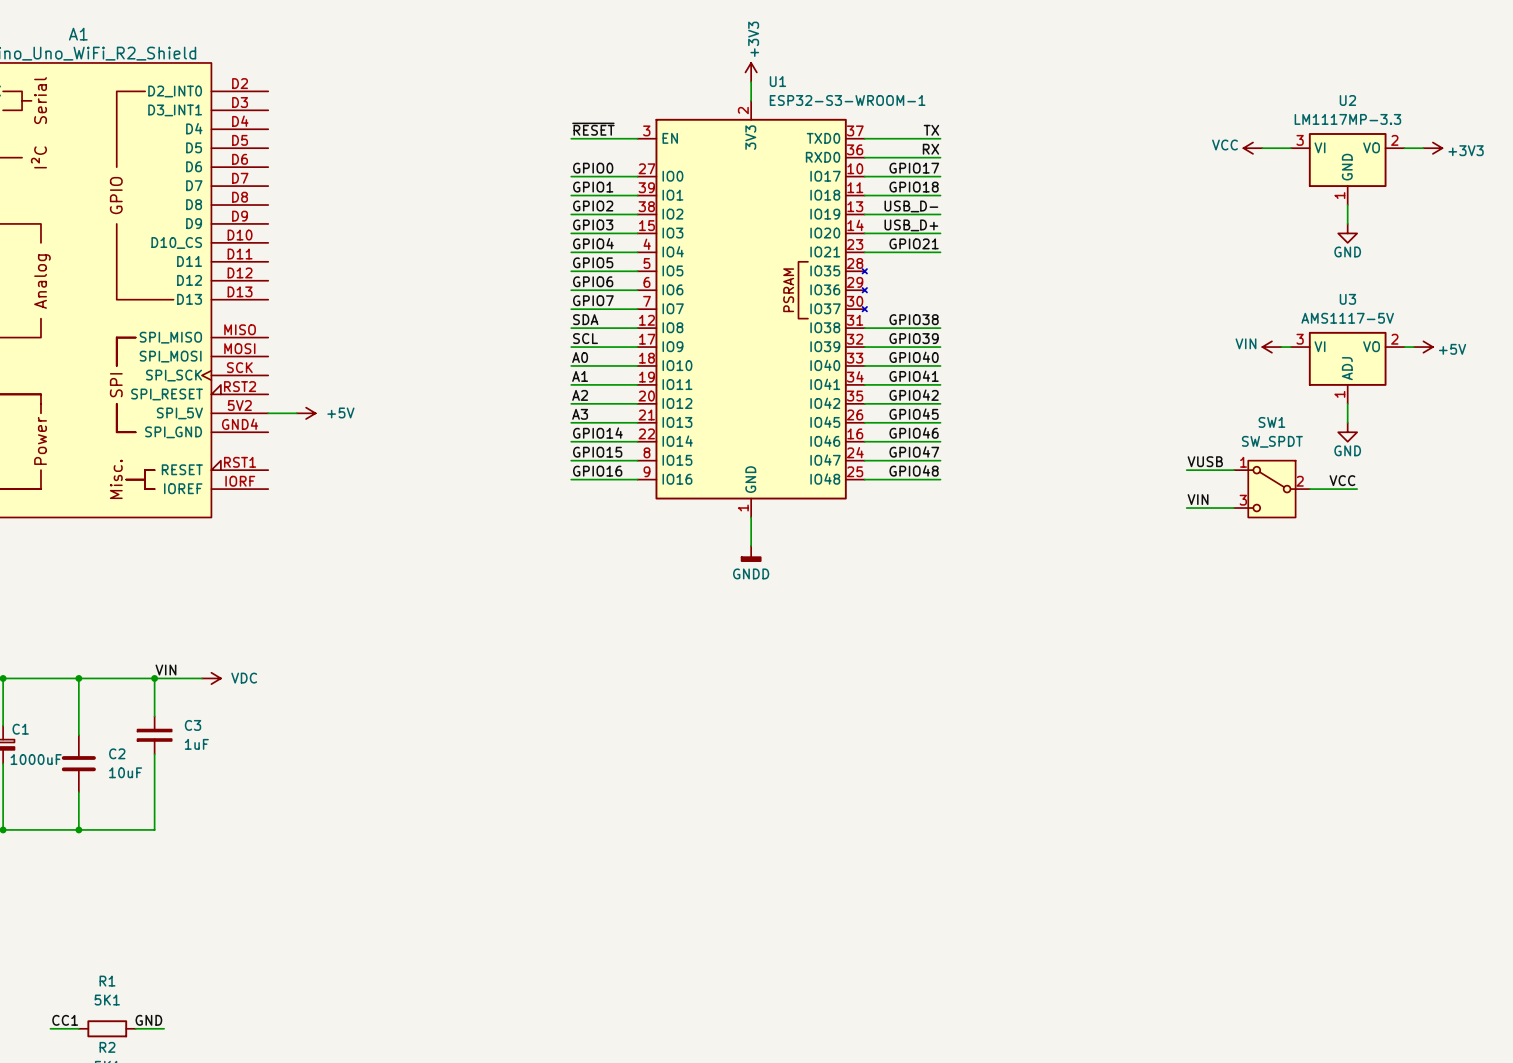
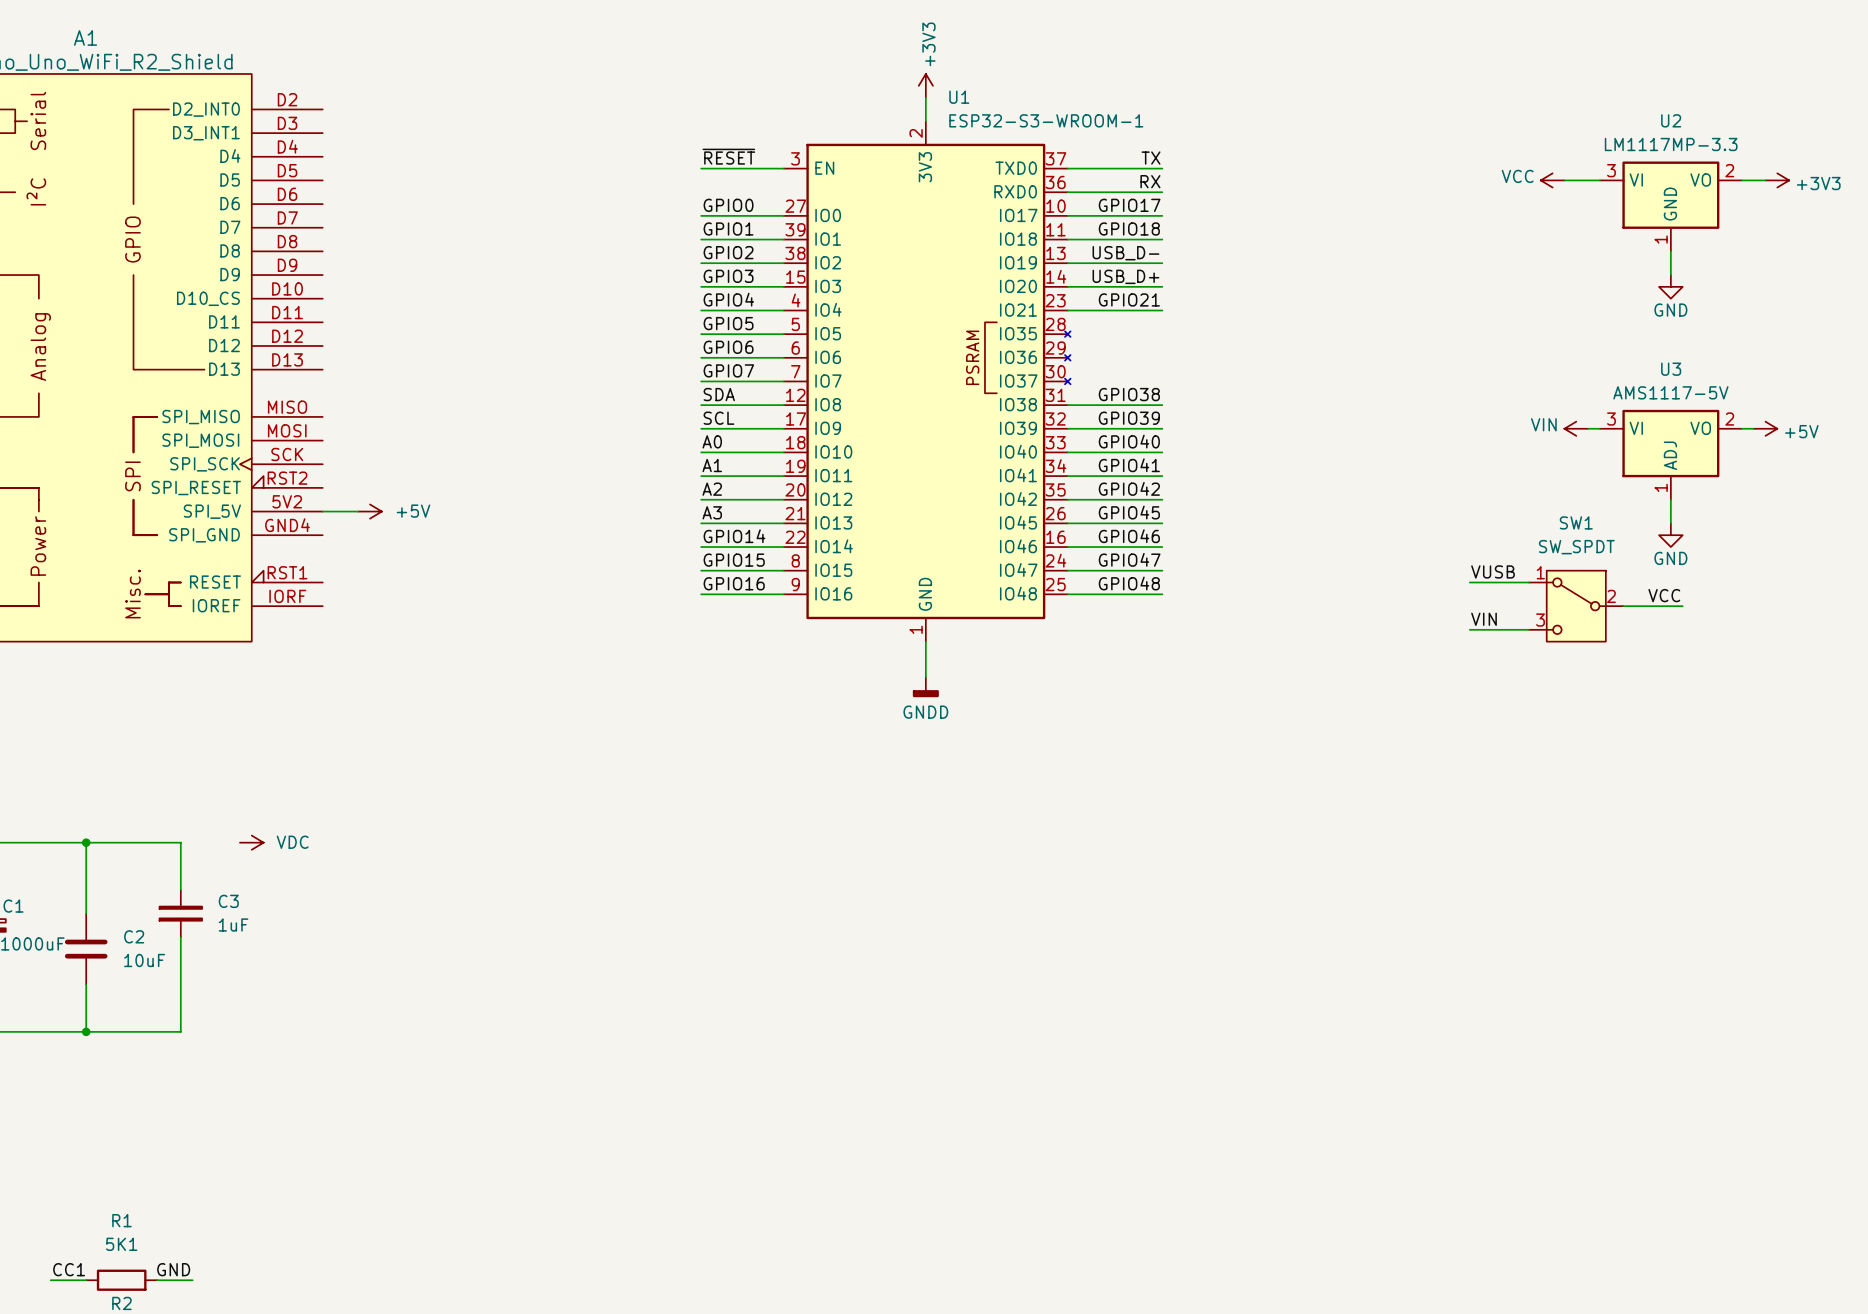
label: VIN (165, 670) -> none
wire: (154, 678) (201, 678) -> none
junction: (154, 678) -> none

